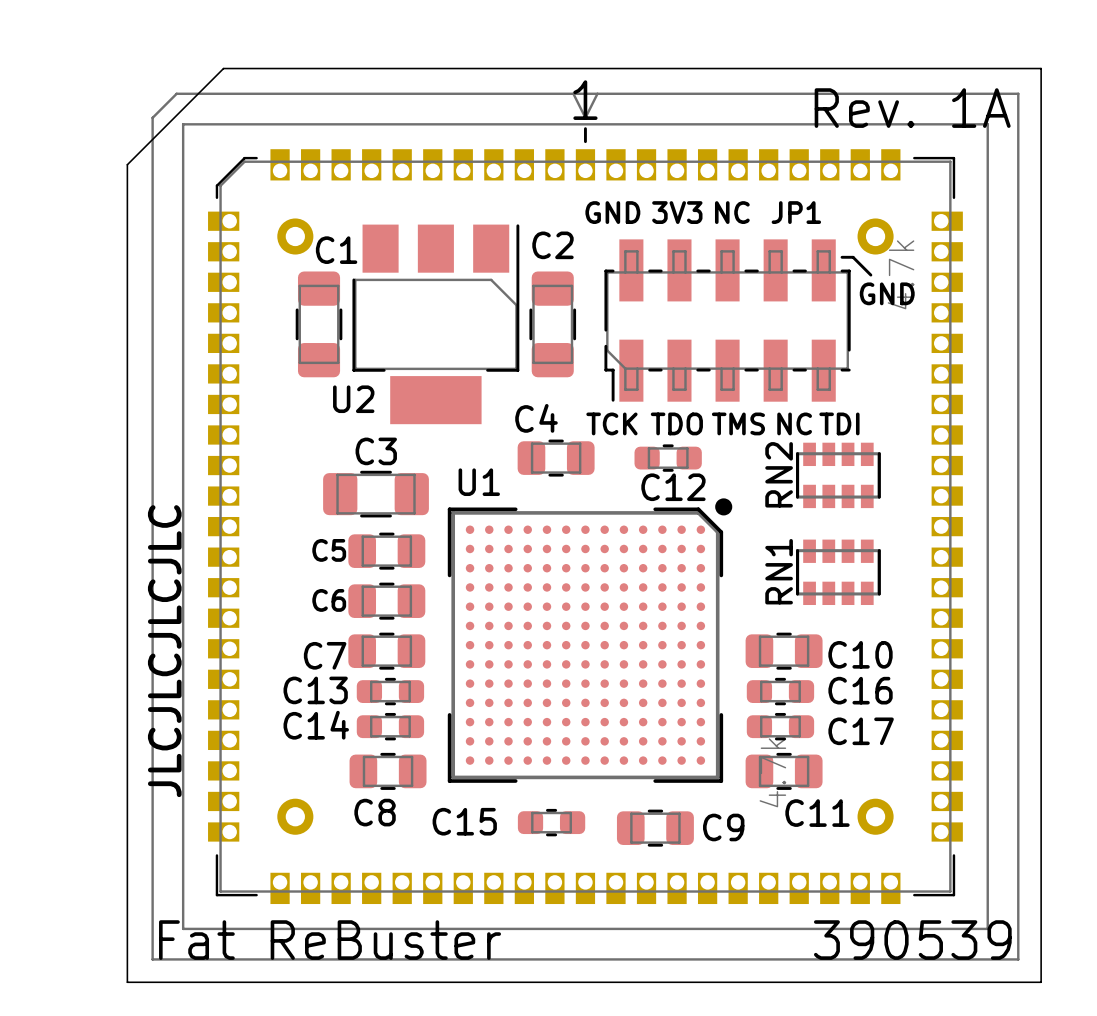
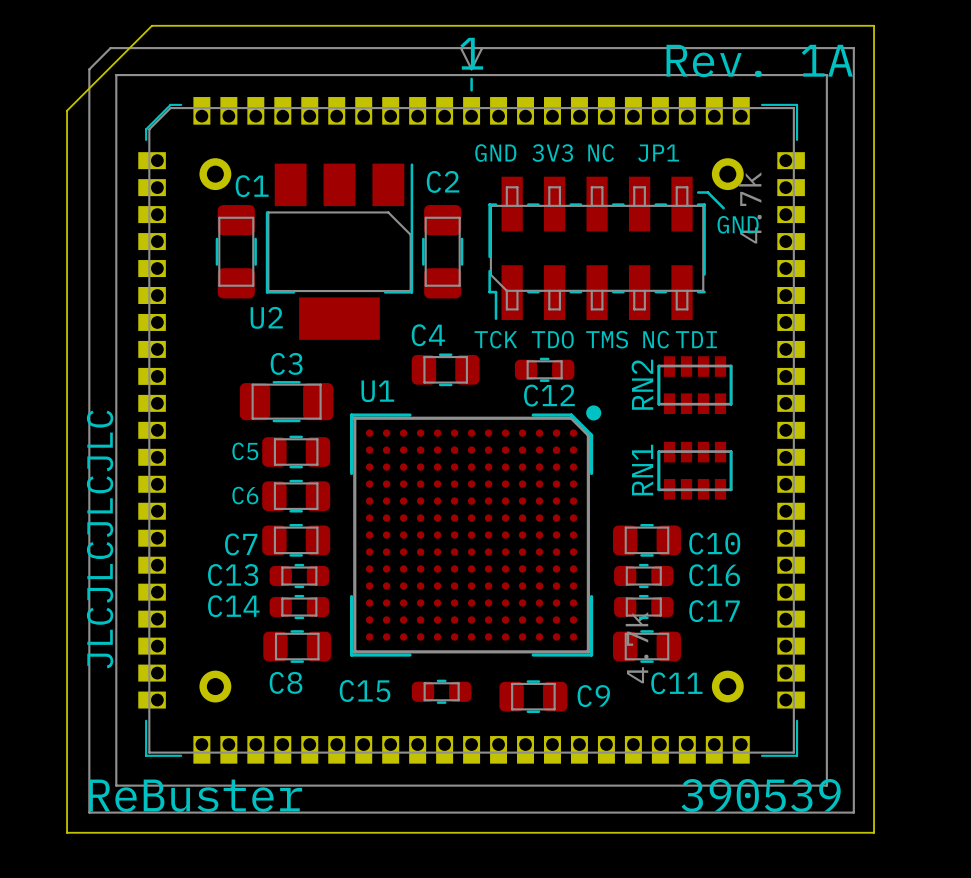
text: Fat ReBuster (330, 940) -> ReBuster (195, 795)

